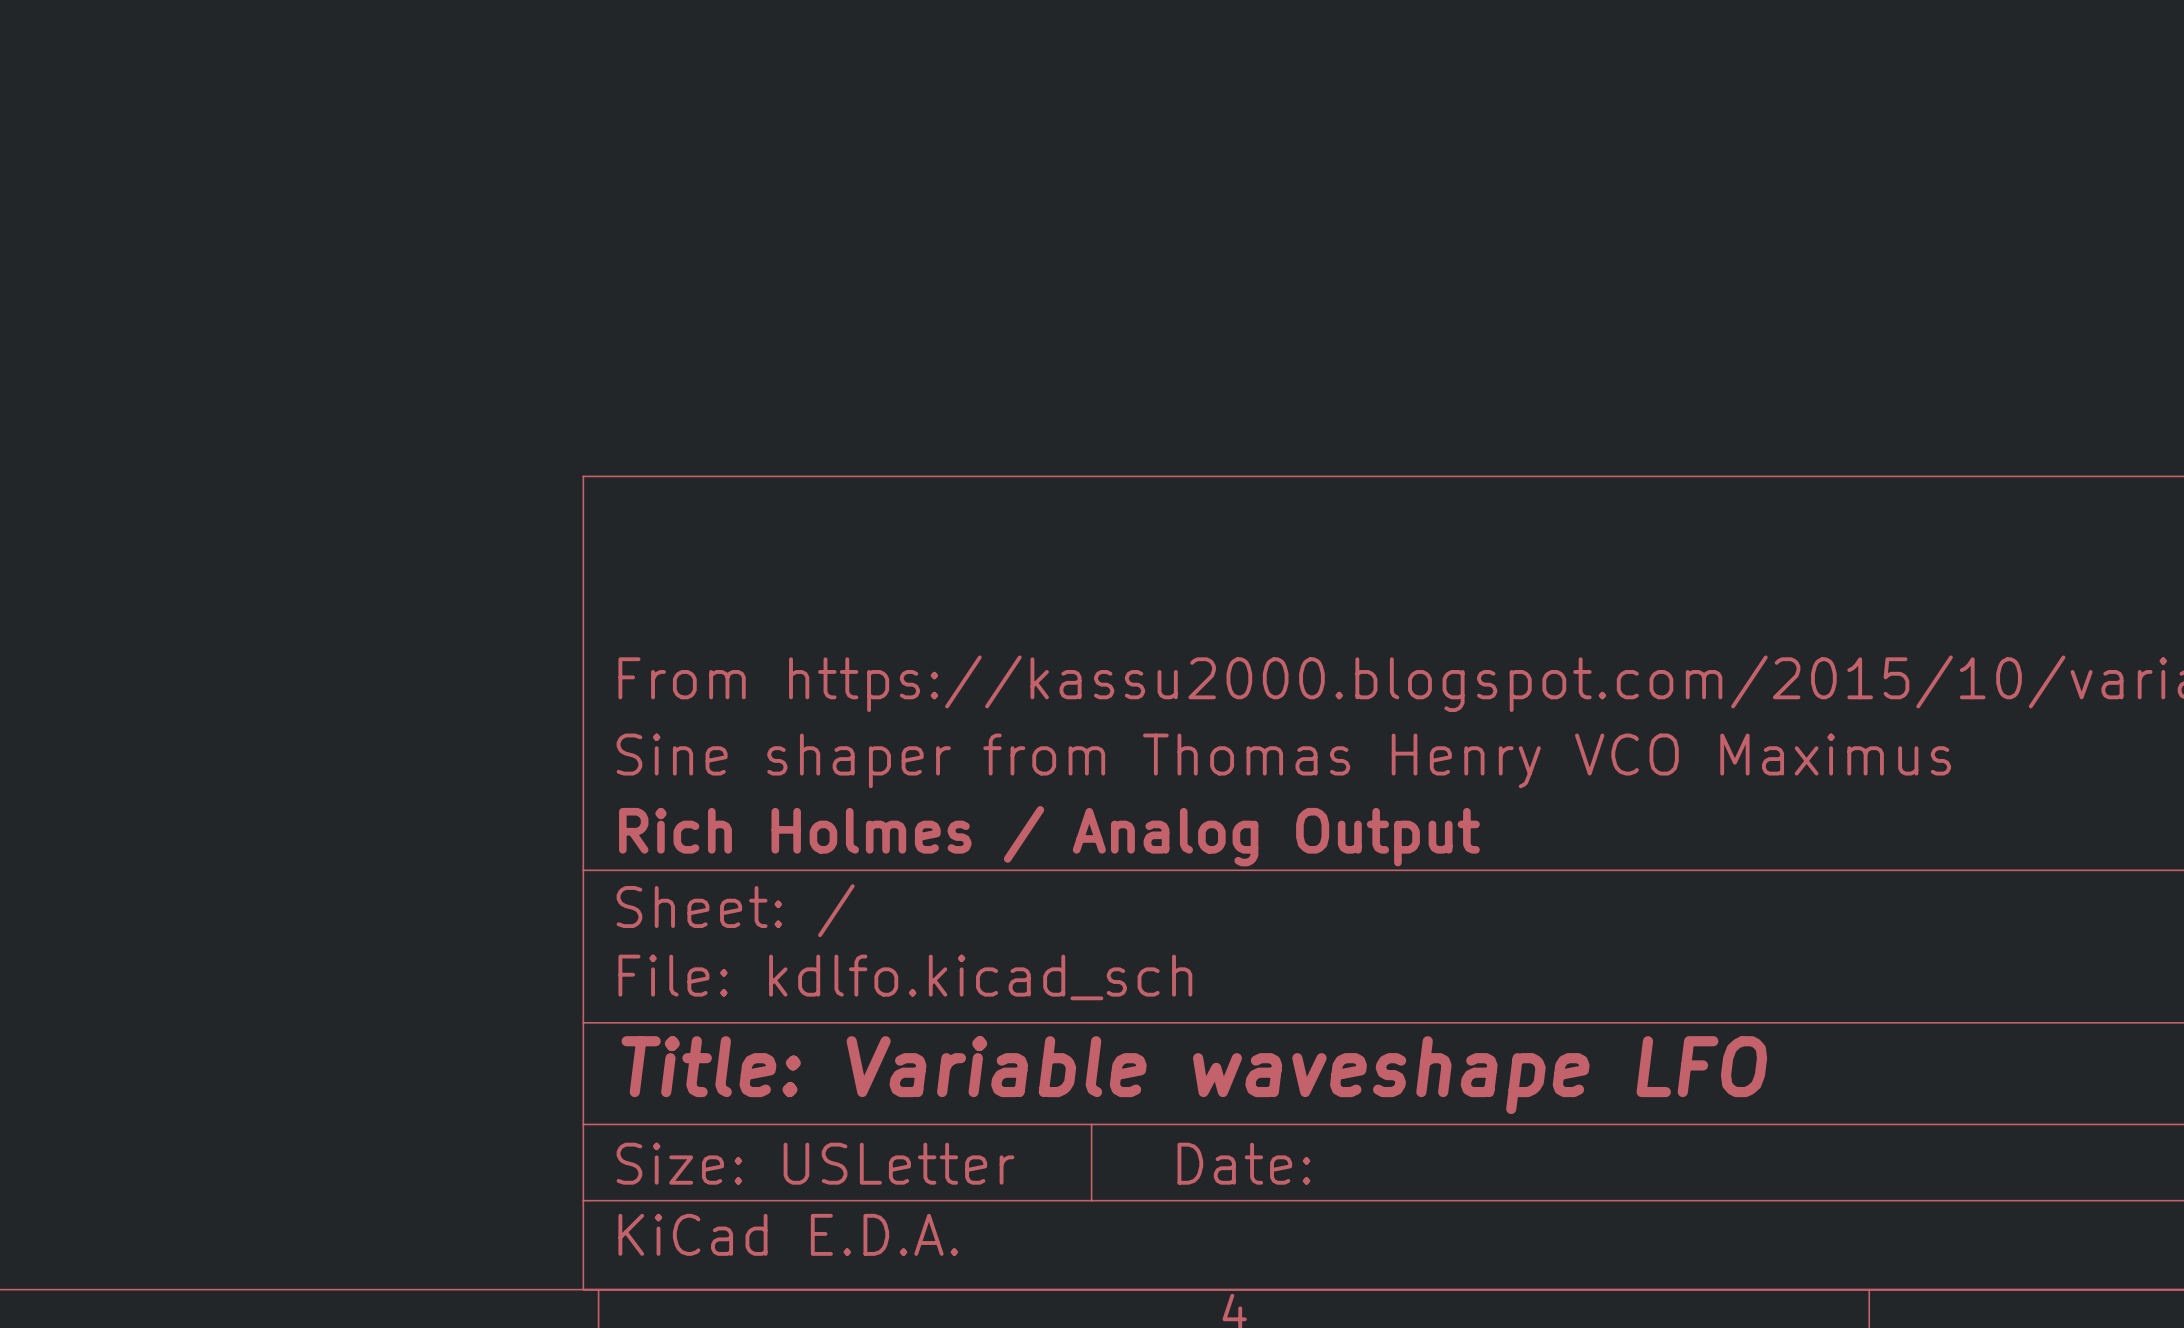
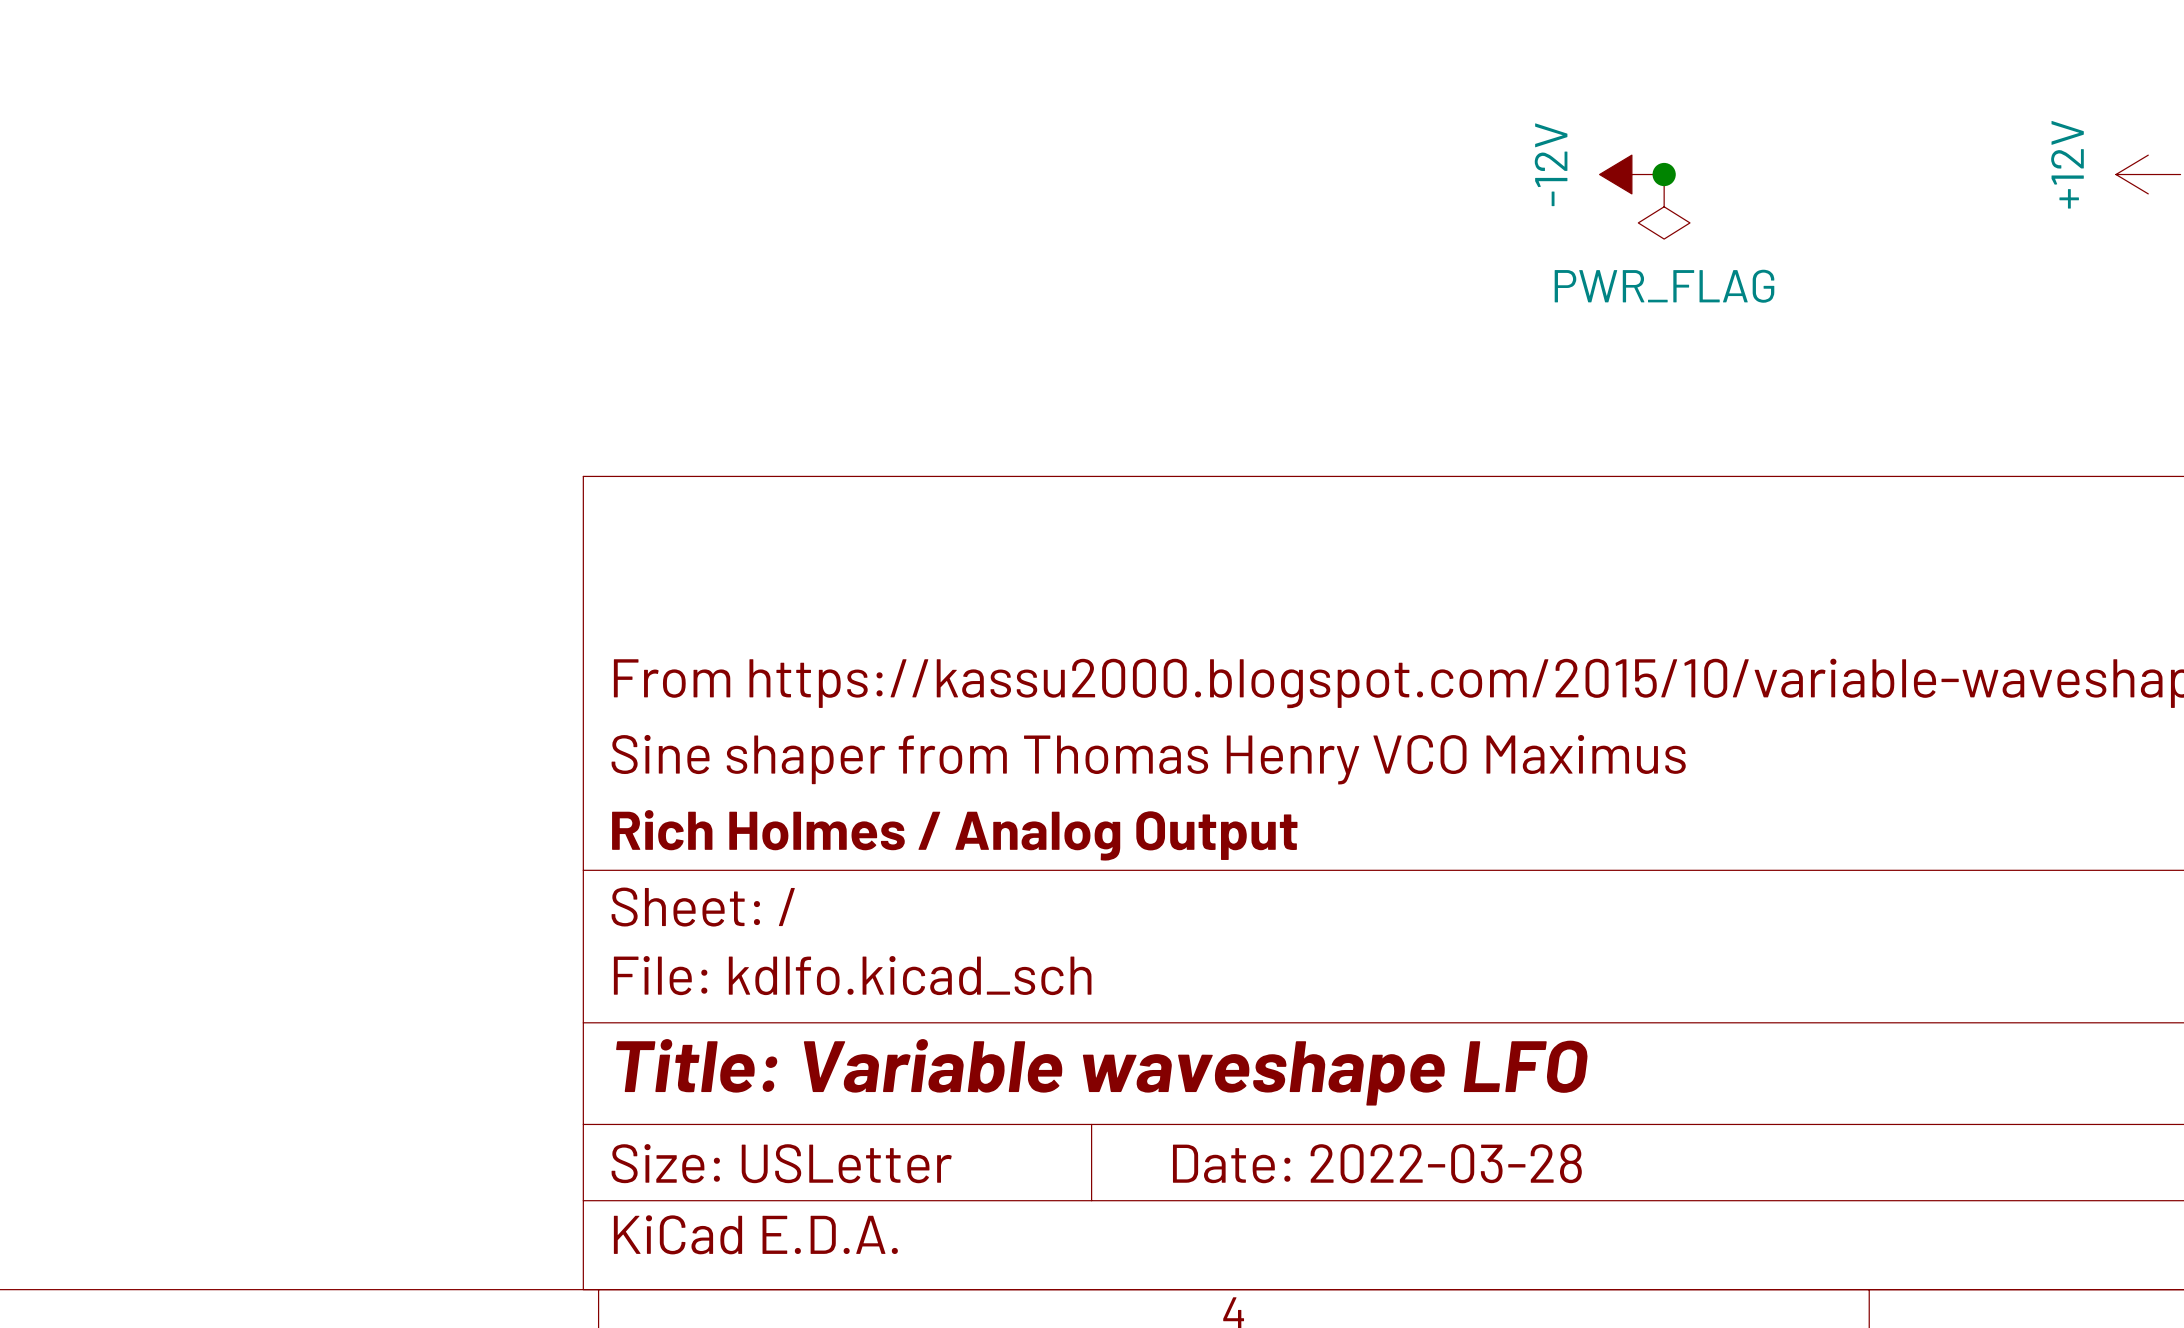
power symbol: none -> -12V (1631, 174)
junction: none -> (1664, 174)
power symbol: none -> +12V (2148, 174)
power symbol: none -> PWR_FLAG (1664, 206)
title block: Date: (1243, 1163) -> Date: 2022-03-28 (1377, 1163)

